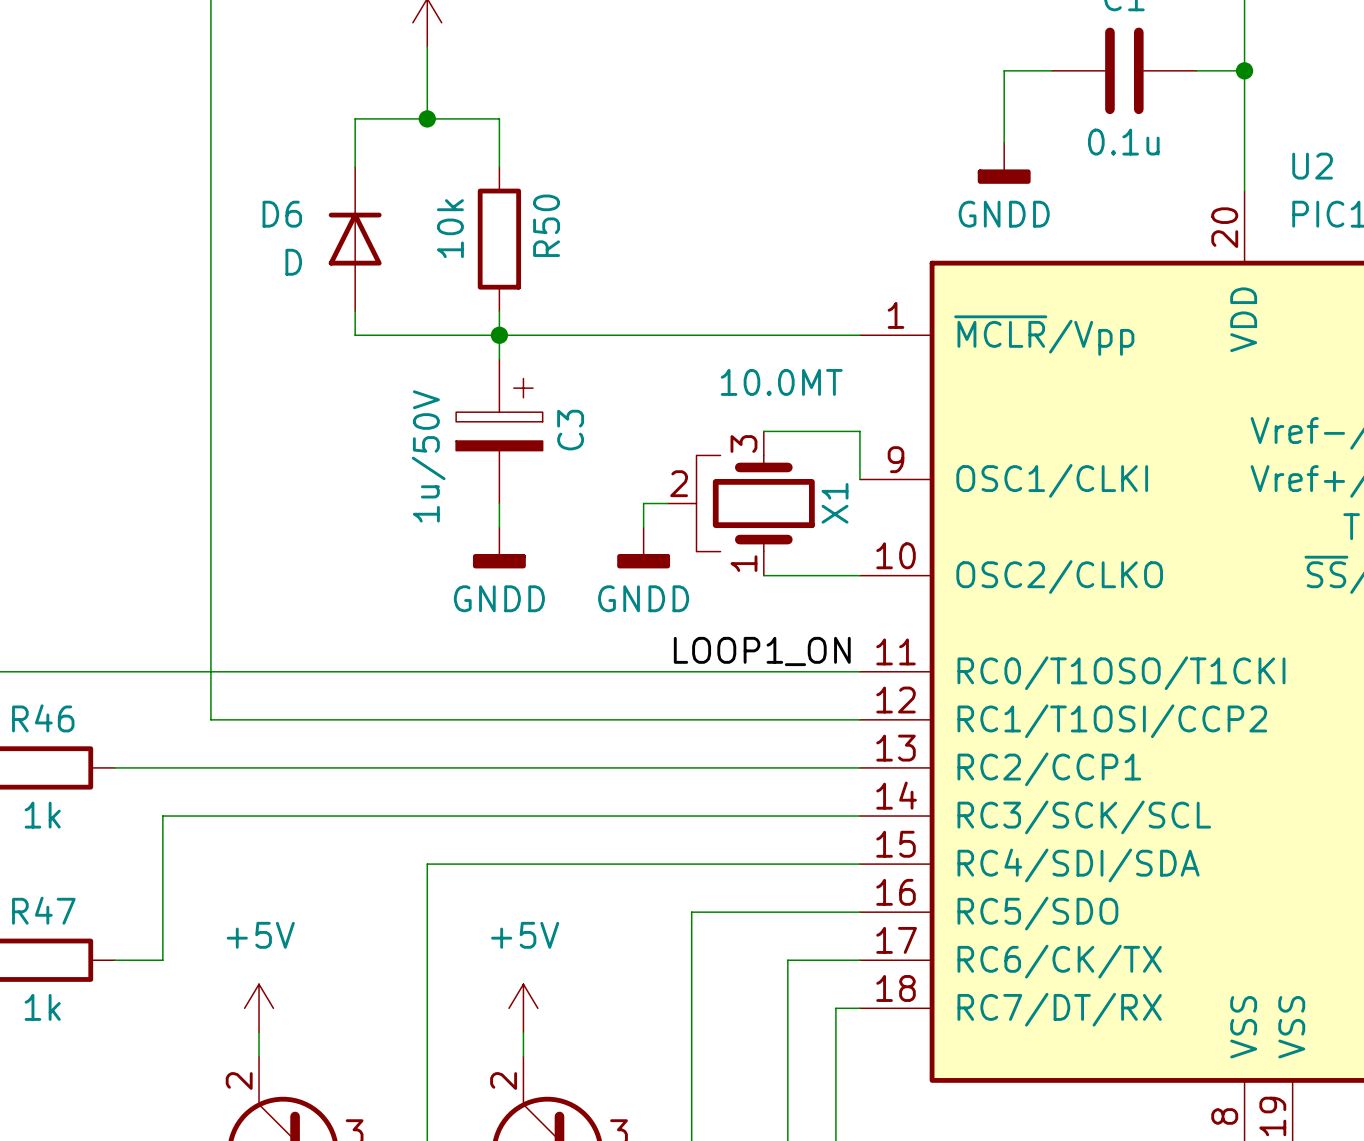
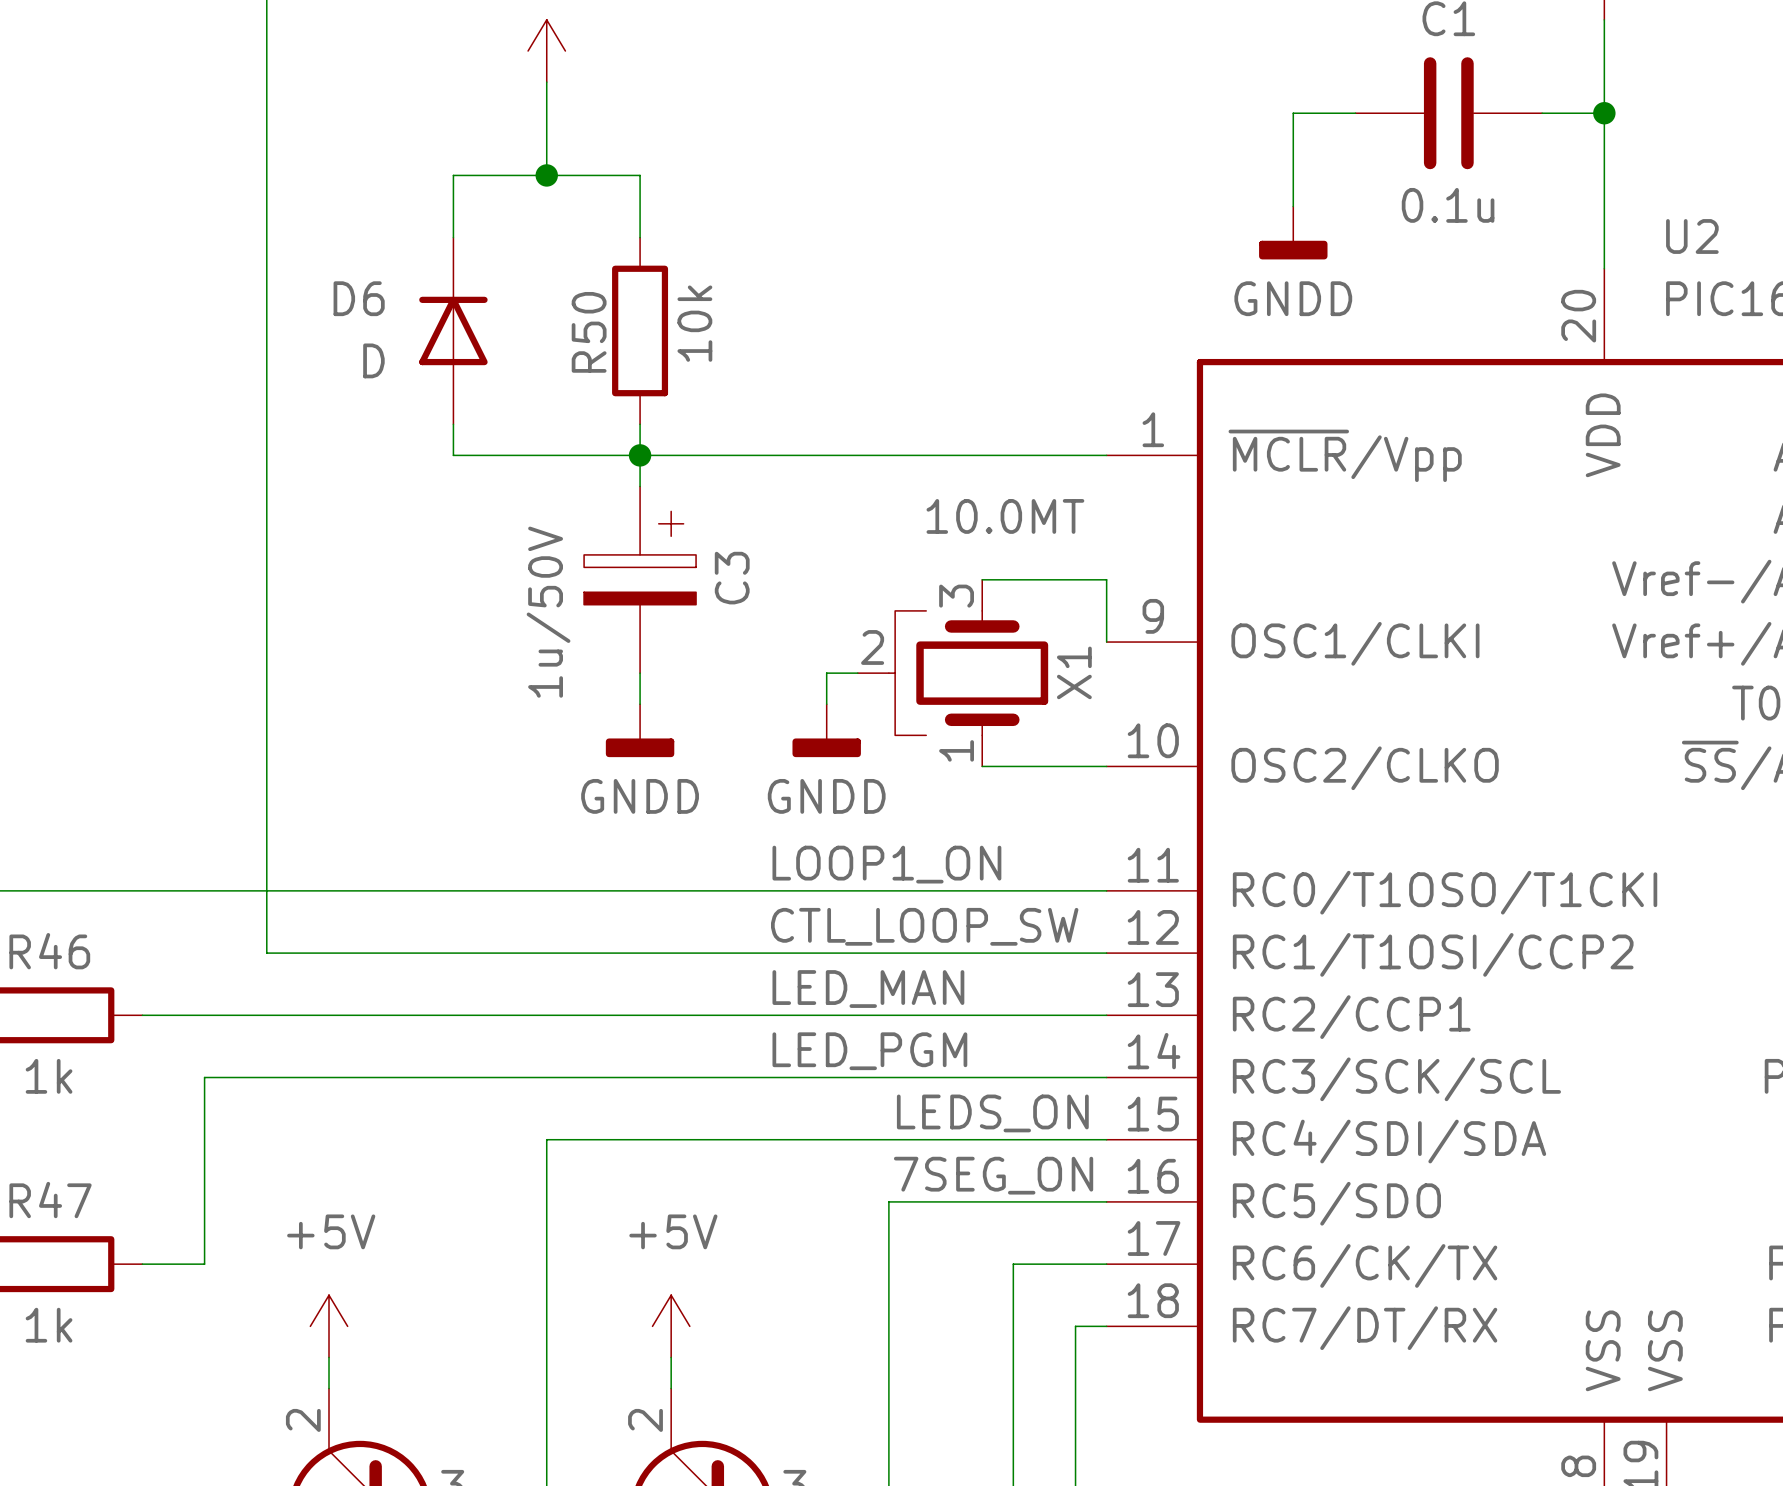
R50 name position: R50 (546, 225) -> R50 (589, 332)
R50 value position: 10k (450, 228) -> 10k (694, 323)
label position: LOOP1_ON (762, 651) -> LOOP1_ON (886, 864)
label: none -> CTL_LOOP_SW (924, 926)
label: none -> LED_MAN (868, 989)
label: none -> LED_PGM (869, 1051)
label: none -> LEDS_ON (992, 1113)
label: none -> 7SEG_ON (993, 1175)

